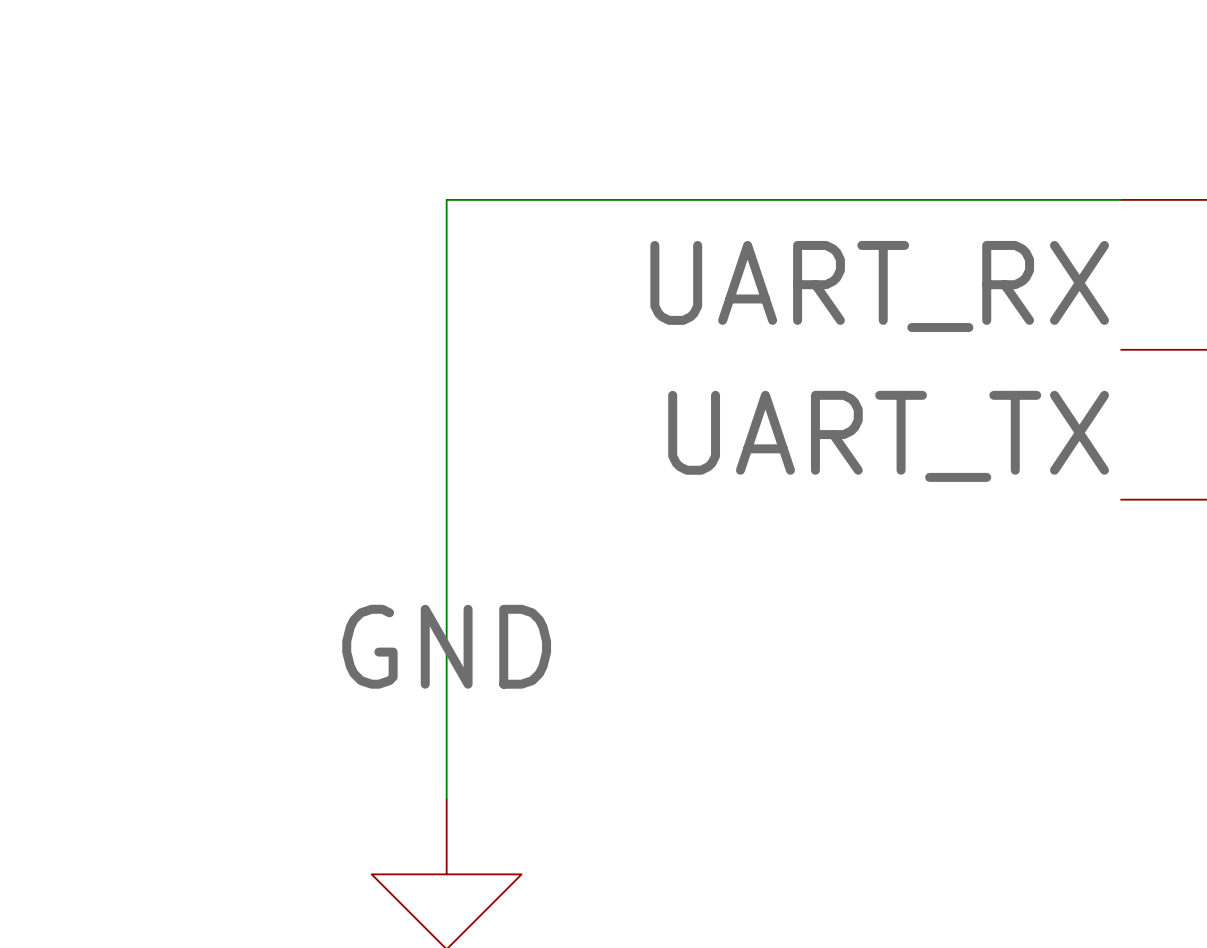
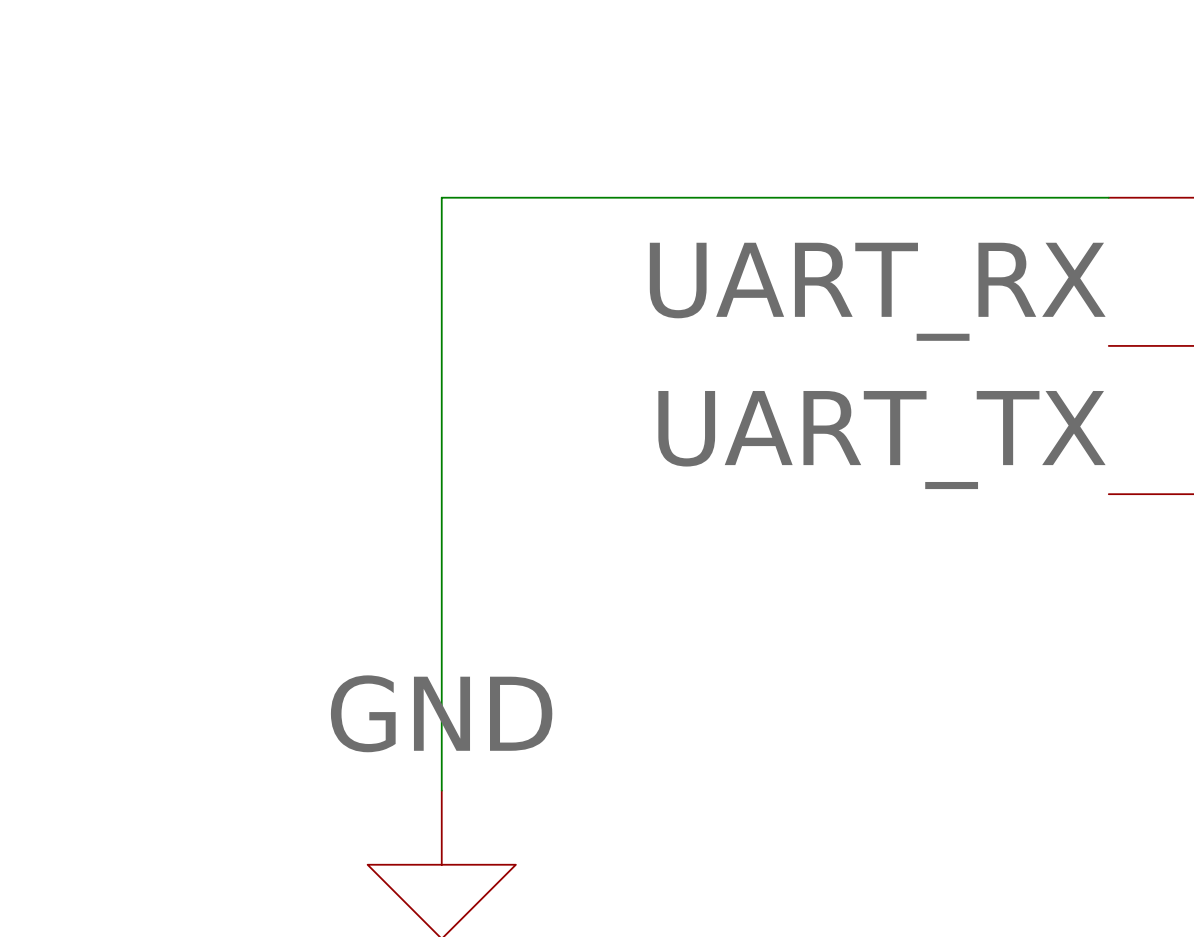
power symbol text position: GND (446, 646) -> GND (441, 713)

